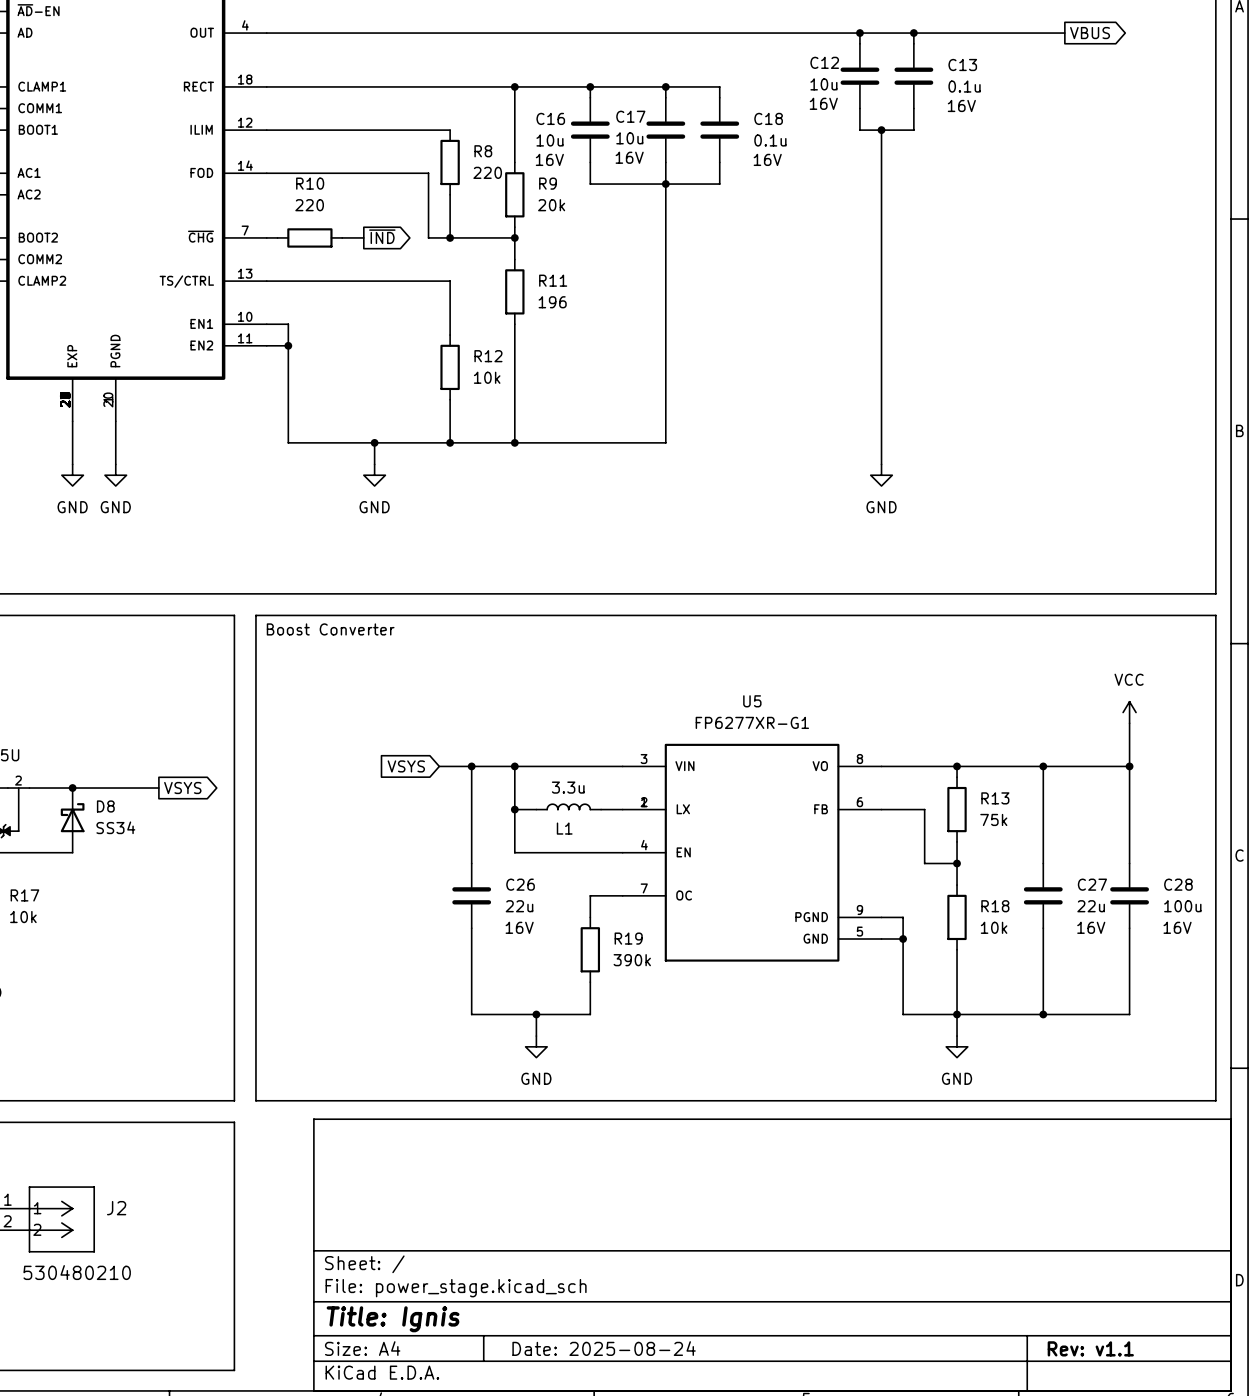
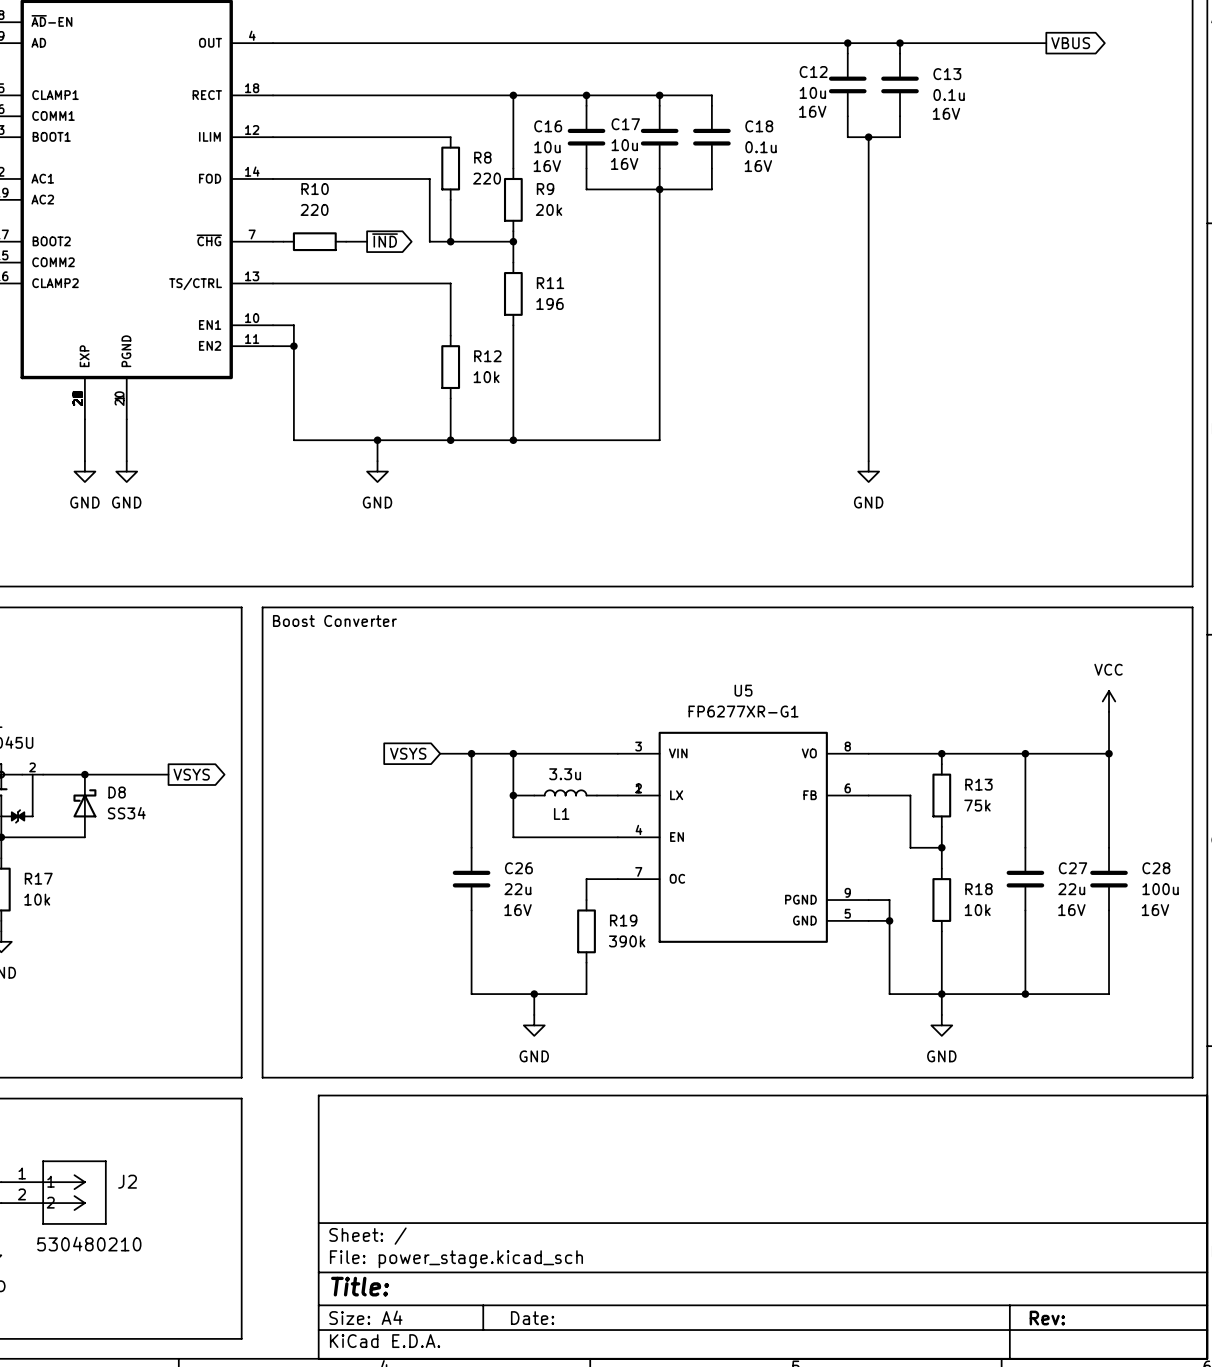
title block: Title: Ignis (393, 1319) -> Title: (360, 1286)
title block: Date: 2025-08-24 (604, 1348) -> Date: (532, 1318)
title block: Rev: v1.1 (1090, 1348) -> Rev: (1047, 1318)

